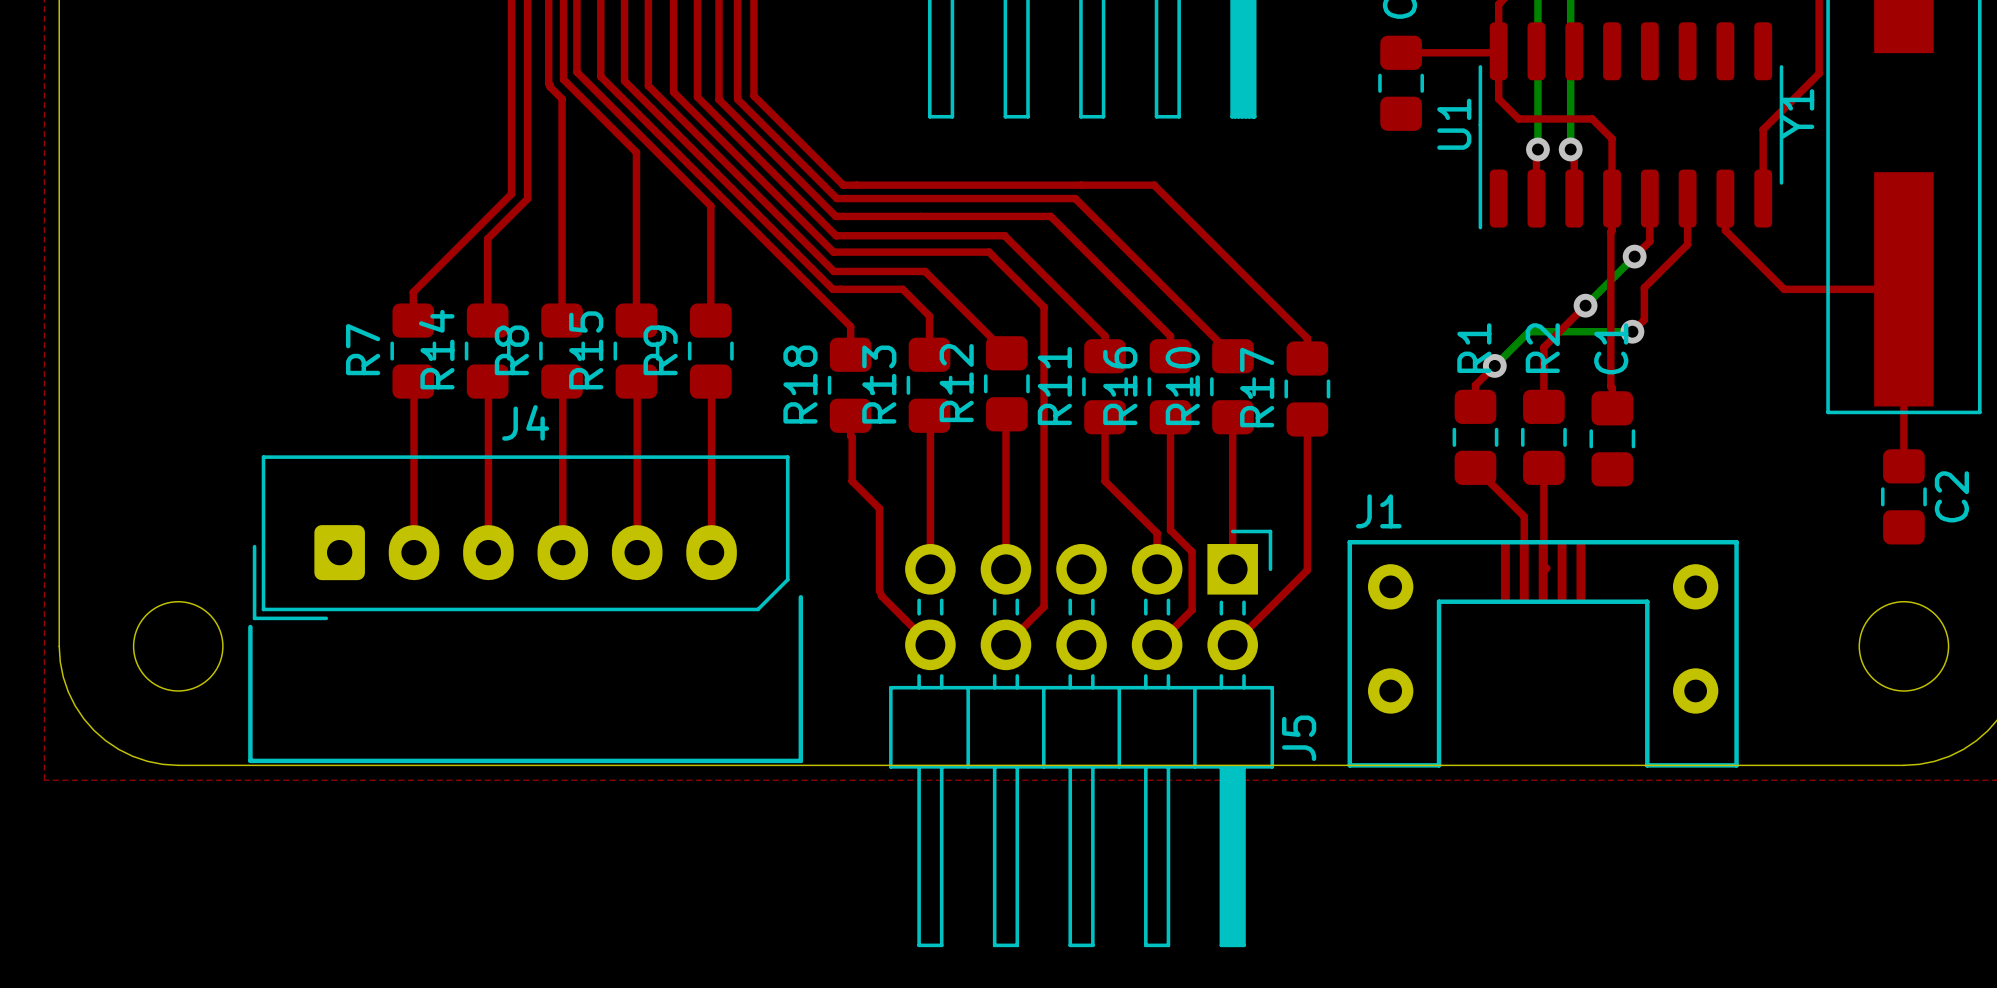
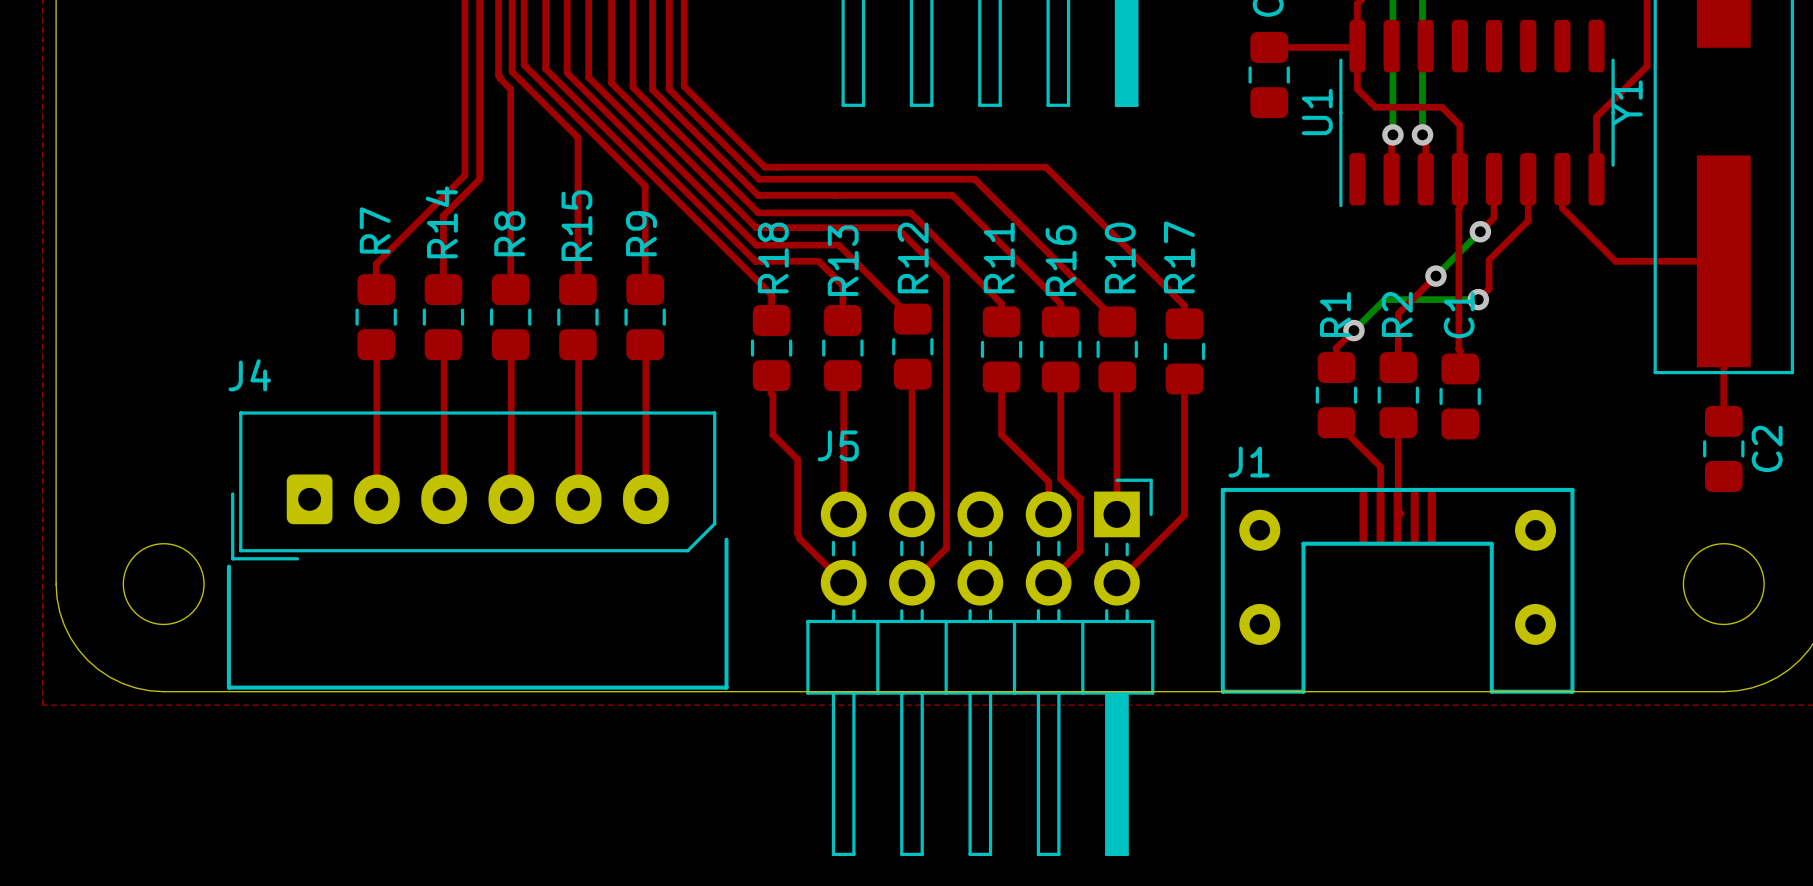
R7 name position: R7 (363, 349) -> R7 (375, 230)
R14 name position: R14 (436, 349) -> R14 (441, 222)
R8 name position: R8 (511, 350) -> R8 (509, 233)
R15 name position: R15 (586, 350) -> R15 (576, 225)
R9 name position: R9 (660, 350) -> R9 (641, 233)
R12 name position: R12 (956, 383) -> R12 (913, 257)
R18 name position: R18 (800, 384) -> R18 (773, 257)
R13 name position: R13 (879, 384) -> R13 (843, 260)
R11 name position: R11 (1054, 386) -> R11 (999, 257)
R16 name position: R16 (1120, 386) -> R16 (1061, 260)
R10 name position: R10 (1182, 386) -> R10 (1120, 257)
R17 name position: R17 (1257, 387) -> R17 (1179, 257)
J4 name position: J4 (525, 422) -> J4 (249, 375)
J5 name rotation: 0° (1299, 738) -> 90° clockwise (838, 445)
J5 name position: J5 (1299, 738) -> J5 (838, 445)

